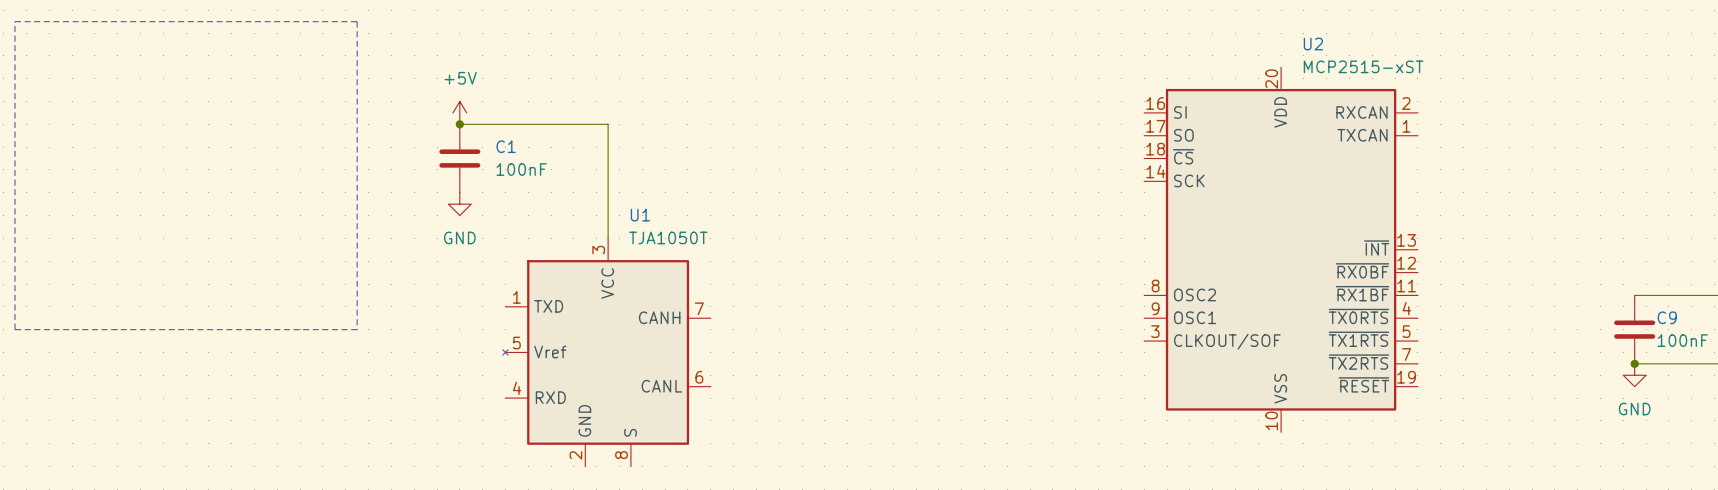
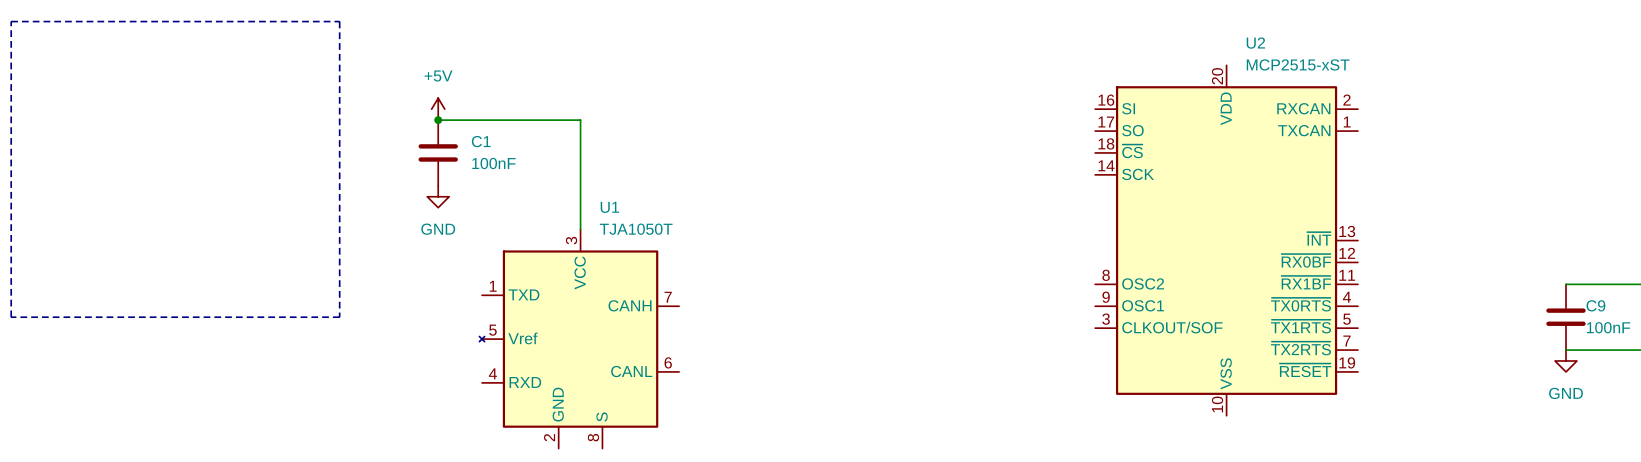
junction: (1634, 363) -> none

